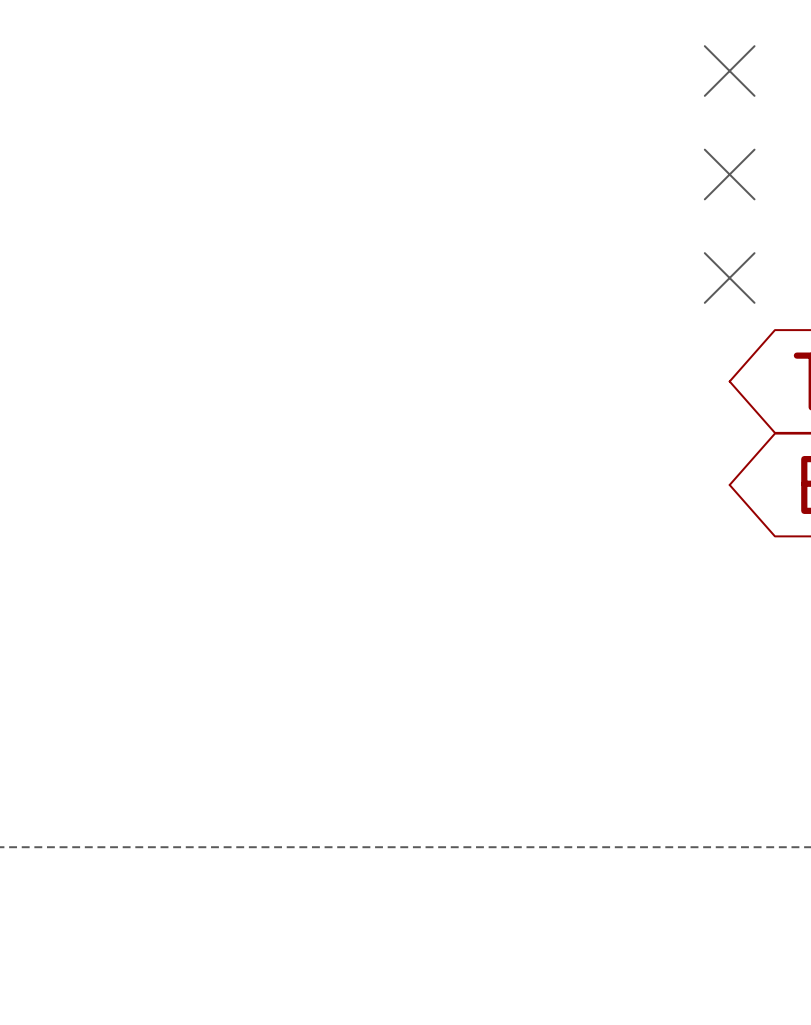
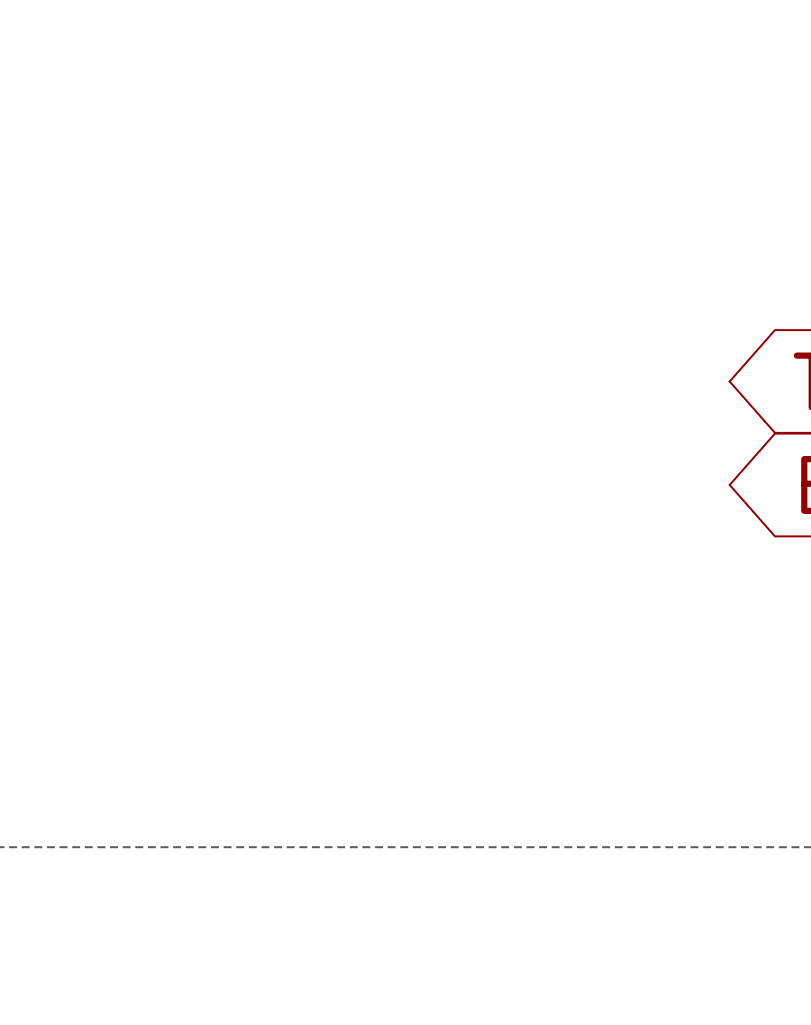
no-connect mark: (729, 71) -> none
no-connect mark: (729, 174) -> none
no-connect mark: (729, 278) -> none

